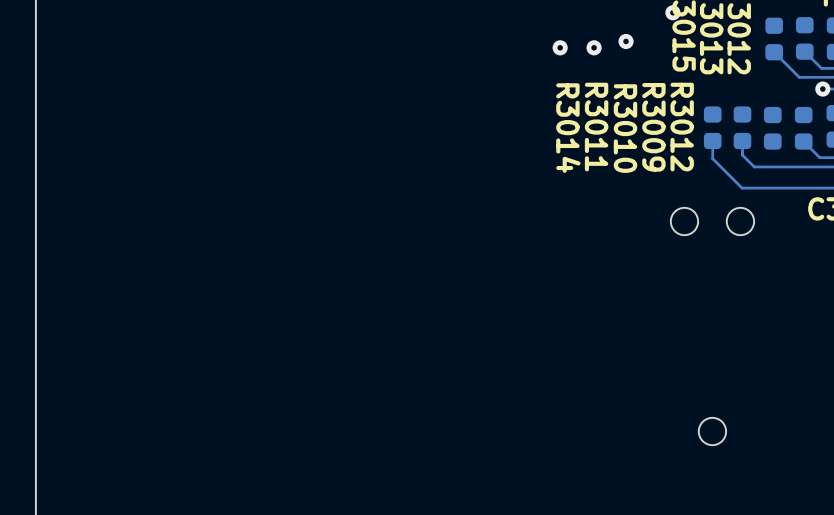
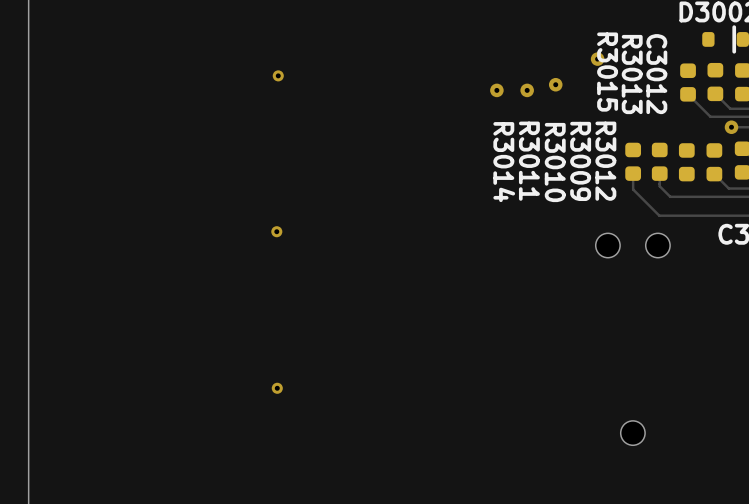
via: none -> (278, 75)
via: none -> (276, 231)
via: none -> (277, 388)

